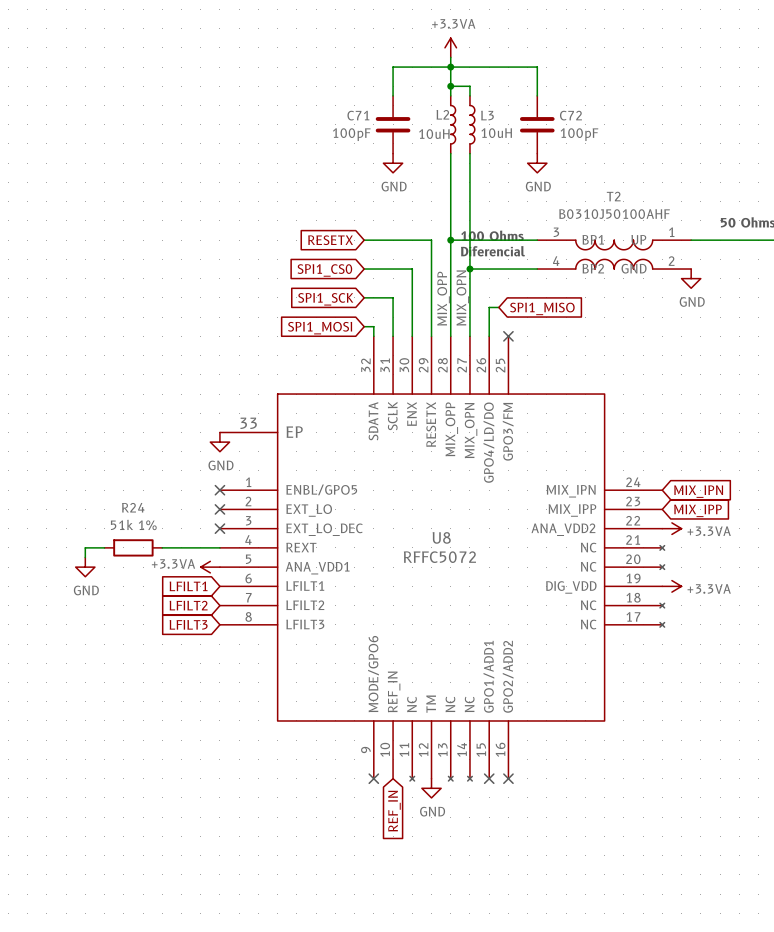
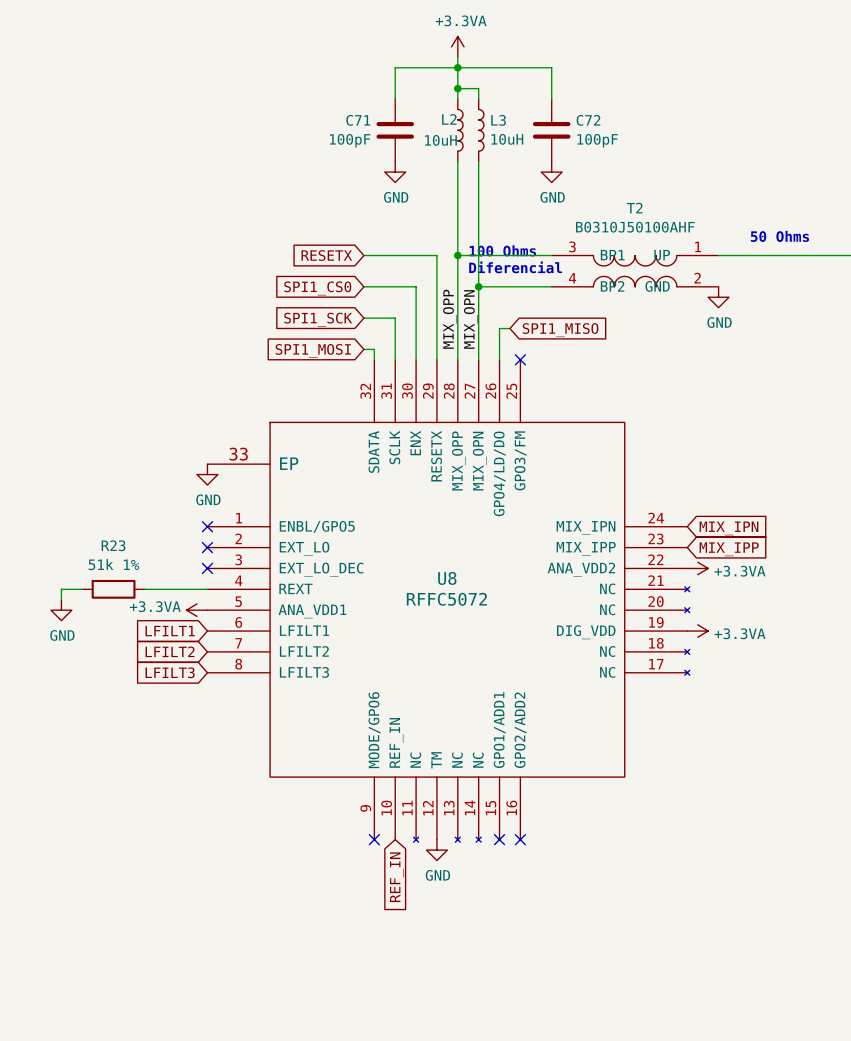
R24 name: R24 (133, 507) -> R23 (113, 545)

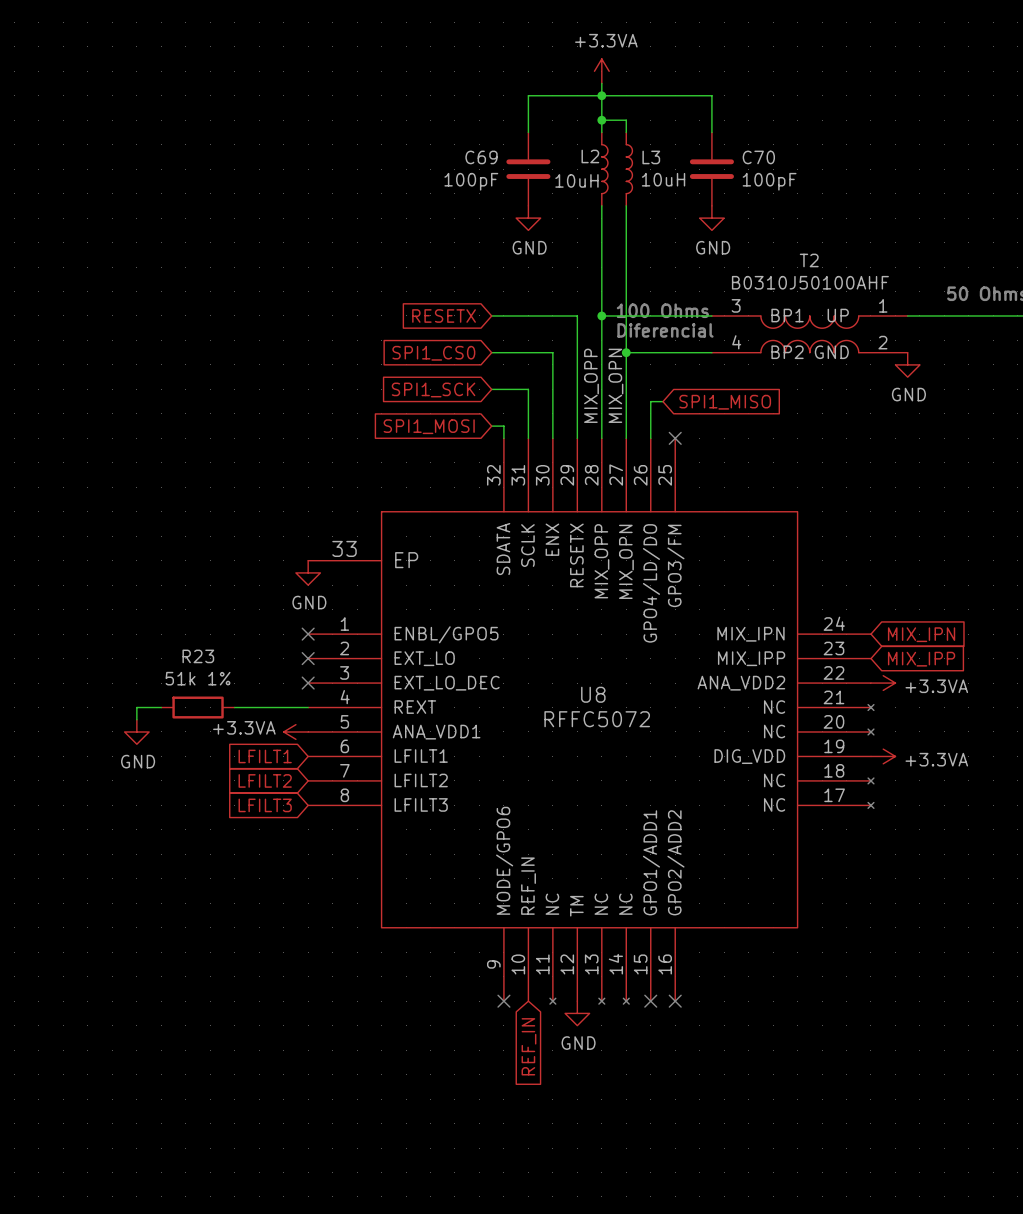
C71 name: C71 (358, 120) -> C69 (481, 157)
C72 name: C72 (588, 120) -> C70 (758, 157)

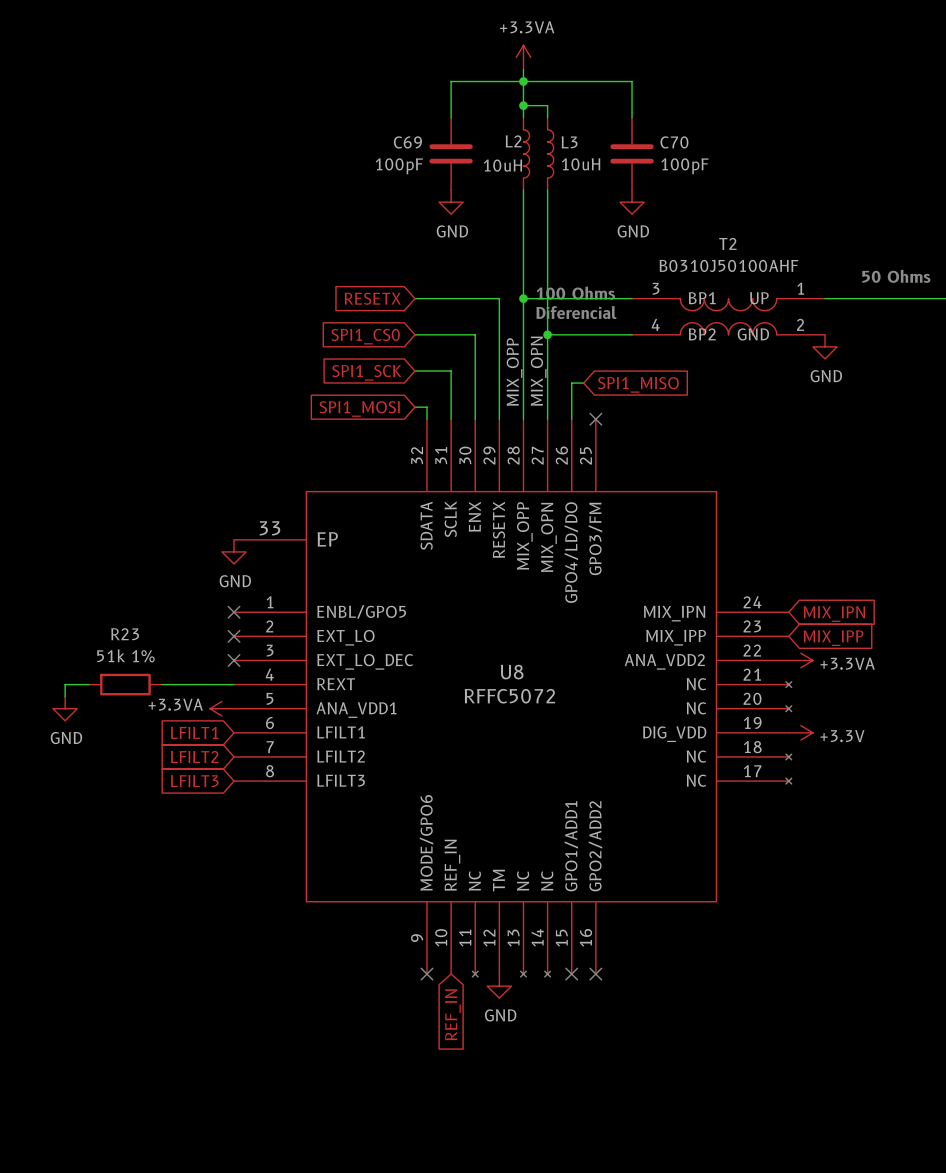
power symbol: +3.3VA (883, 756) -> +3.3V (800, 732)

